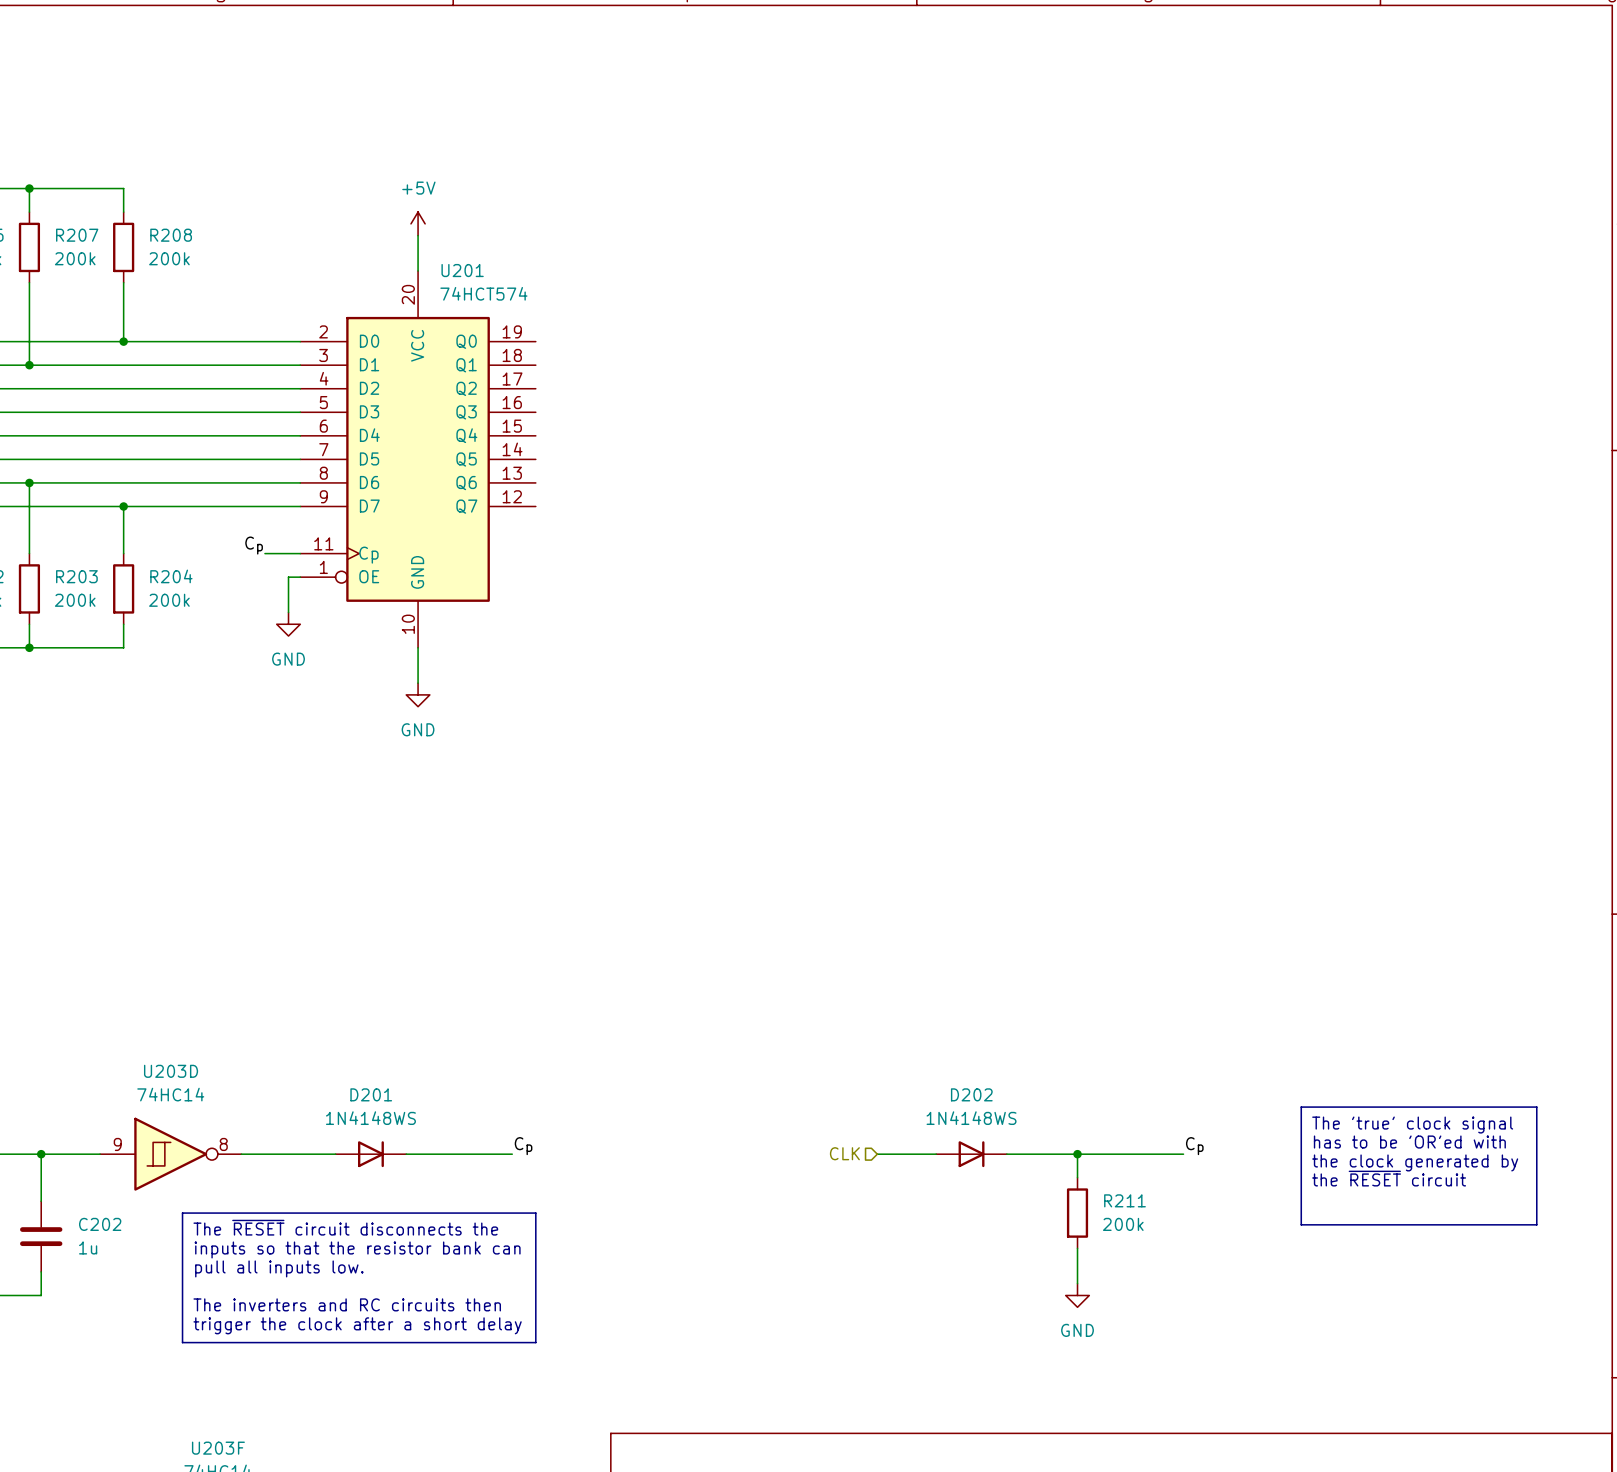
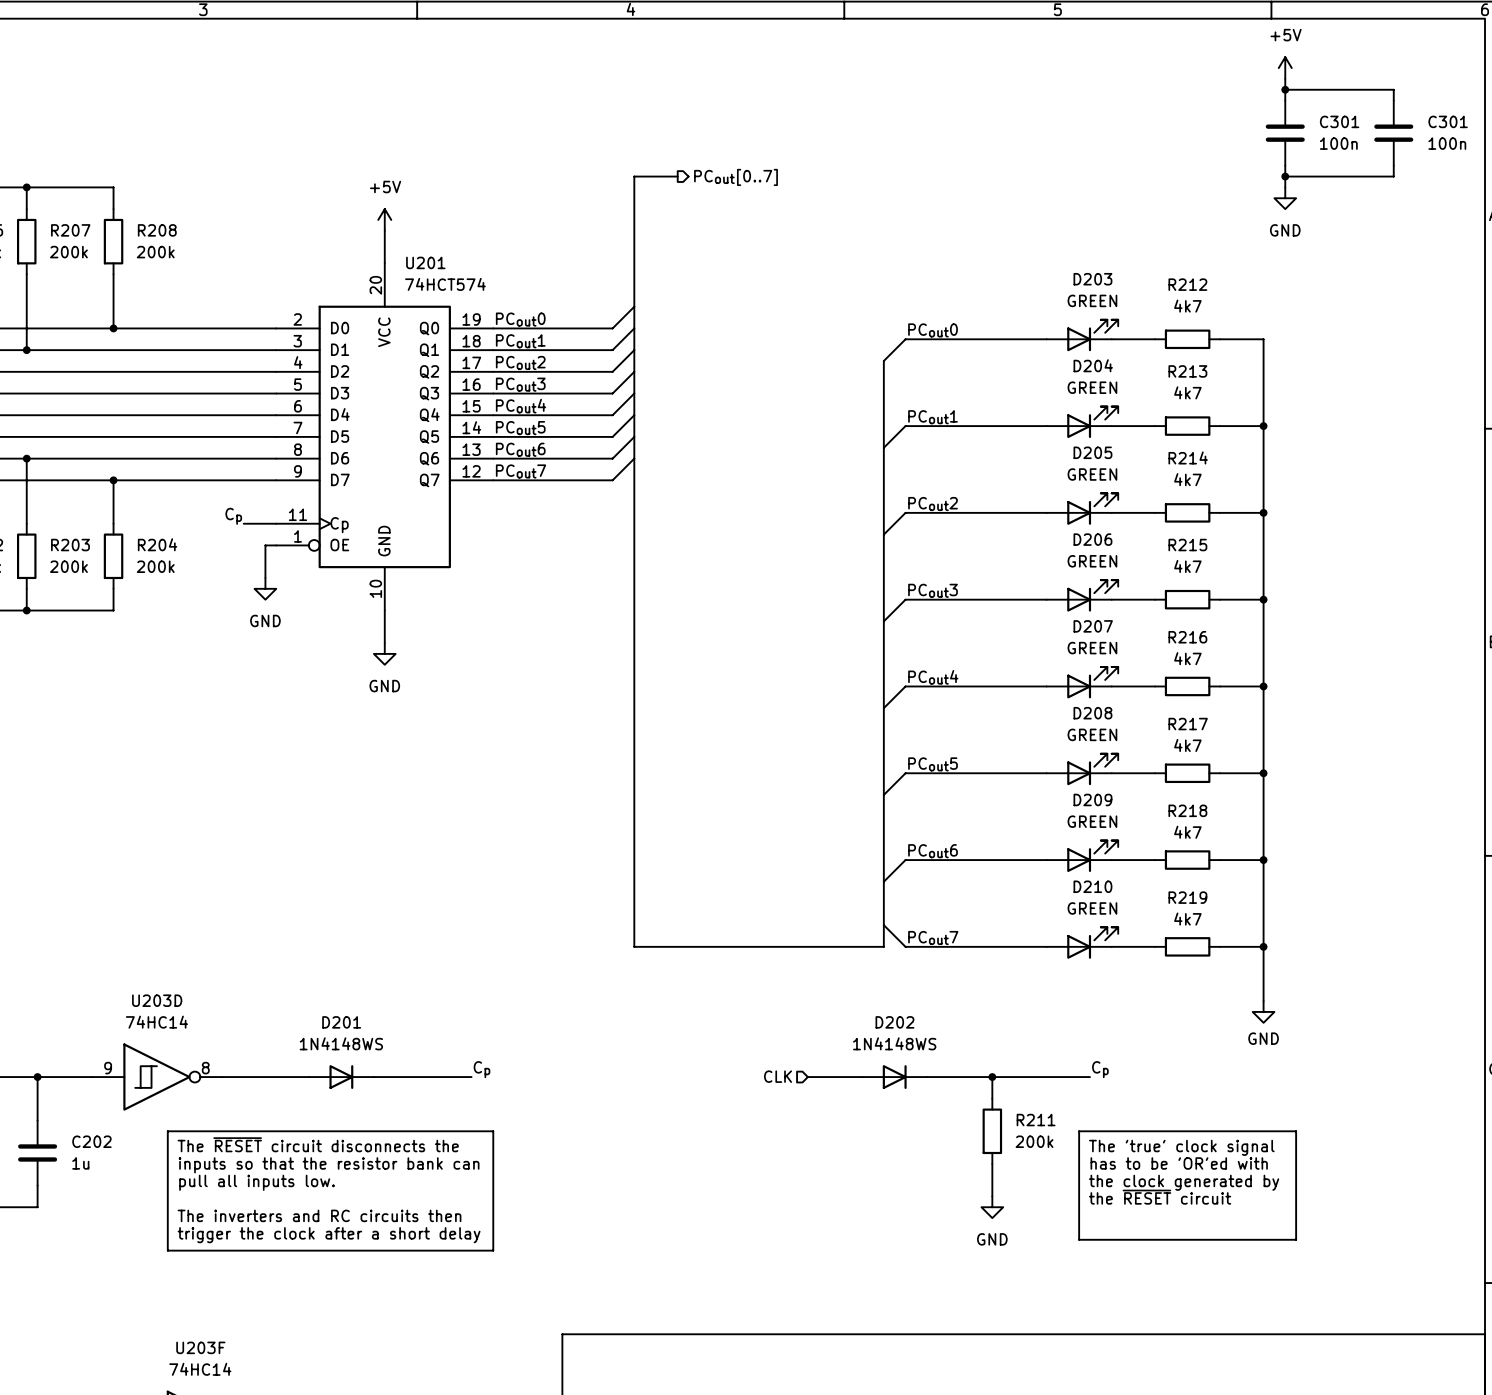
power symbol: none -> +5V (1285, 68)
wire: none -> (1285, 78) (1285, 100)
wire: none -> (1285, 89) (1393, 89) (1393, 100)
junction: none -> (1285, 89)
C301: none -> 100n (1285, 133)
C301: none -> 100n (1393, 133)
wire: none -> (1285, 165) (1285, 187)
wire: none -> (1393, 165) (1393, 176) (1285, 176)
bus: none -> (677, 176) (634, 176) (634, 946) (883, 946) (883, 360)
junction: none -> (1285, 176)
hierarchical label: none -> PCout[0..7] (736, 177)
power symbol: none -> GND (1285, 198)
wire: none -> (634, 306) (612, 328) (493, 328)
label: none -> PCout0 (520, 319)
wire: none -> (634, 328) (612, 350) (493, 350)
label: none -> PCout0 (933, 330)
D203: none -> GREEN (1082, 335)
wire: none -> (1046, 339) (905, 339) (883, 360)
wire: none -> (1111, 339) (1155, 339)
R212: none -> 4k7 (1187, 339)
wire: none -> (1220, 339) (1263, 339) (1263, 1001)
label: none -> PCout1 (520, 341)
wire: none -> (634, 350) (612, 371) (493, 371)
label: none -> PCout2 (520, 362)
wire: none -> (634, 371) (612, 393) (493, 393)
label: none -> PCout3 (520, 384)
wire: none -> (634, 393) (612, 415) (493, 415)
label: none -> PCout4 (520, 406)
wire: none -> (634, 415) (612, 436) (493, 436)
label: none -> PCout1 (933, 417)
D204: none -> GREEN (1082, 422)
wire: none -> (1046, 426) (905, 426) (883, 447)
wire: none -> (1111, 426) (1155, 426)
R213: none -> 4k7 (1187, 426)
wire: none -> (1220, 426) (1263, 426)
junction: none -> (1263, 426)
label: none -> PCout5 (520, 428)
wire: none -> (634, 436) (612, 458) (493, 458)
label: none -> PCout6 (520, 449)
wire: none -> (634, 458) (612, 480) (493, 480)
label: none -> PCout7 (520, 471)
label: none -> PCout2 (933, 504)
D205: none -> GREEN (1082, 509)
wire: none -> (1046, 512) (905, 512) (883, 534)
wire: none -> (1111, 512) (1155, 512)
R214: none -> 4k7 (1187, 512)
wire: none -> (1220, 512) (1263, 512)
junction: none -> (1263, 512)
label: none -> PCout3 (933, 590)
D206: none -> GREEN (1082, 595)
wire: none -> (1046, 599) (905, 599) (883, 621)
wire: none -> (1111, 599) (1155, 599)
R215: none -> 4k7 (1187, 599)
wire: none -> (1220, 599) (1263, 599)
junction: none -> (1263, 599)
label: none -> PCout4 (933, 677)
D207: none -> GREEN (1082, 682)
wire: none -> (1046, 686) (905, 686) (883, 708)
wire: none -> (1111, 686) (1155, 686)
R216: none -> 4k7 (1187, 686)
wire: none -> (1220, 686) (1263, 686)
junction: none -> (1263, 686)
label: none -> PCout5 (933, 764)
D208: none -> GREEN (1082, 769)
wire: none -> (1046, 773) (905, 773) (883, 794)
wire: none -> (1111, 773) (1155, 773)
R217: none -> 4k7 (1187, 773)
wire: none -> (1220, 773) (1263, 773)
junction: none -> (1263, 773)
label: none -> PCout6 (933, 851)
D209: none -> GREEN (1082, 856)
wire: none -> (1046, 860) (905, 860) (883, 881)
wire: none -> (1111, 860) (1155, 860)
R218: none -> 4k7 (1187, 860)
wire: none -> (1220, 860) (1263, 860)
junction: none -> (1263, 860)
wire: none -> (883, 925) (905, 946) (1046, 946)
label: none -> PCout7 (933, 937)
D210: none -> GREEN (1082, 943)
wire: none -> (1111, 946) (1155, 946)
R219: none -> 4k7 (1187, 946)
wire: none -> (1220, 946) (1263, 946)
junction: none -> (1263, 946)
power symbol: none -> GND (1263, 1011)
line: (1301, 1107) (1536, 1107) (1536, 1224) (1301, 1224) (1301, 1107) -> (1079, 1131) (1296, 1131) (1296, 1239) (1079, 1239) (1079, 1131)
text position: The 'true' clock signal (1412, 1125) -> The 'true' clock signal (1181, 1147)
text position: has to be 'OR'ed with (1409, 1142) -> has to be 'OR'ed with (1179, 1163)
text position: the clock generated by (1415, 1162) -> the clock generated by (1184, 1182)
text position: the ~{RESET} circuit (1389, 1178) -> the ~{RESET} circuit (1160, 1197)

